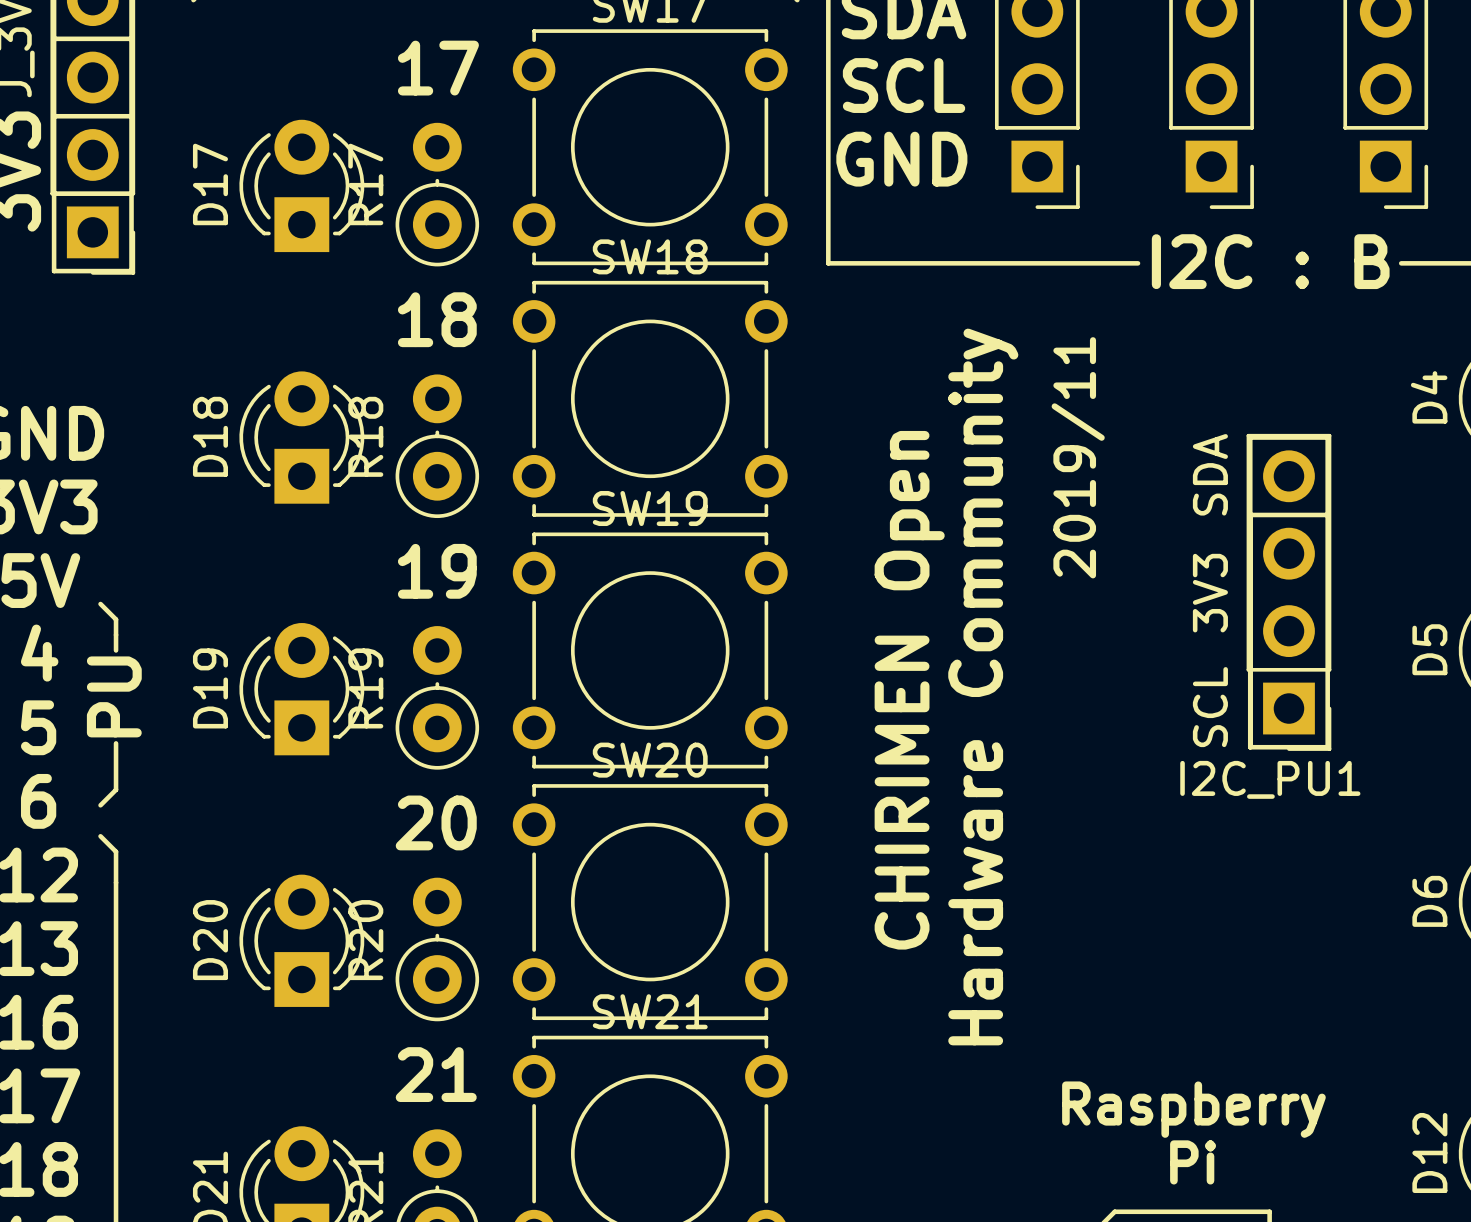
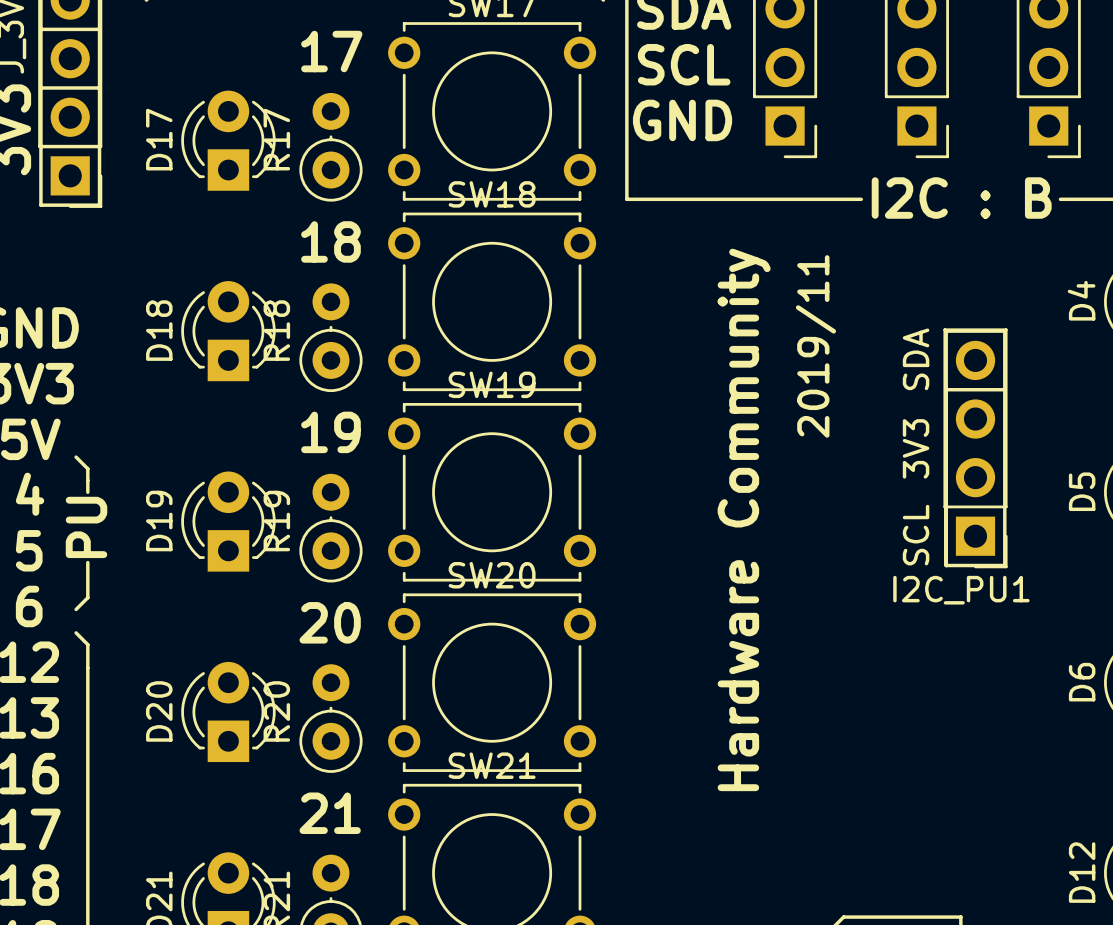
text: CHIRIMEN Open (909, 690) -> none
text: Raspberry (1193, 1109) -> none
text: Pi (1193, 1162) -> none

